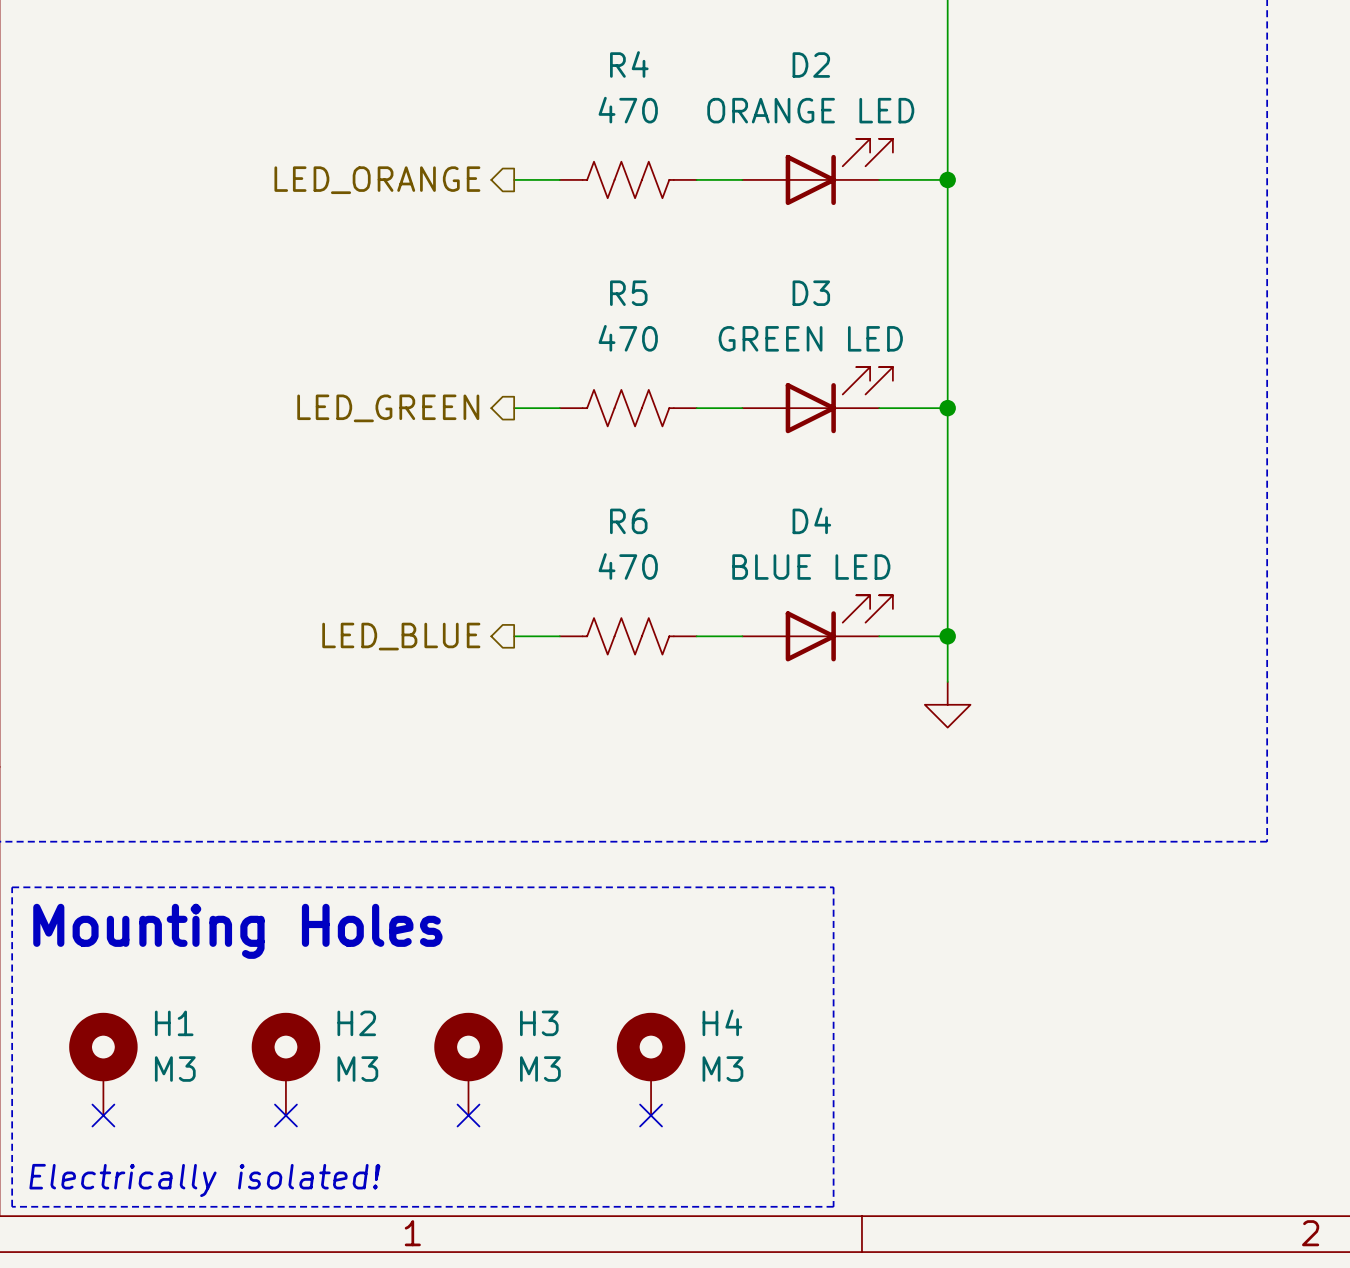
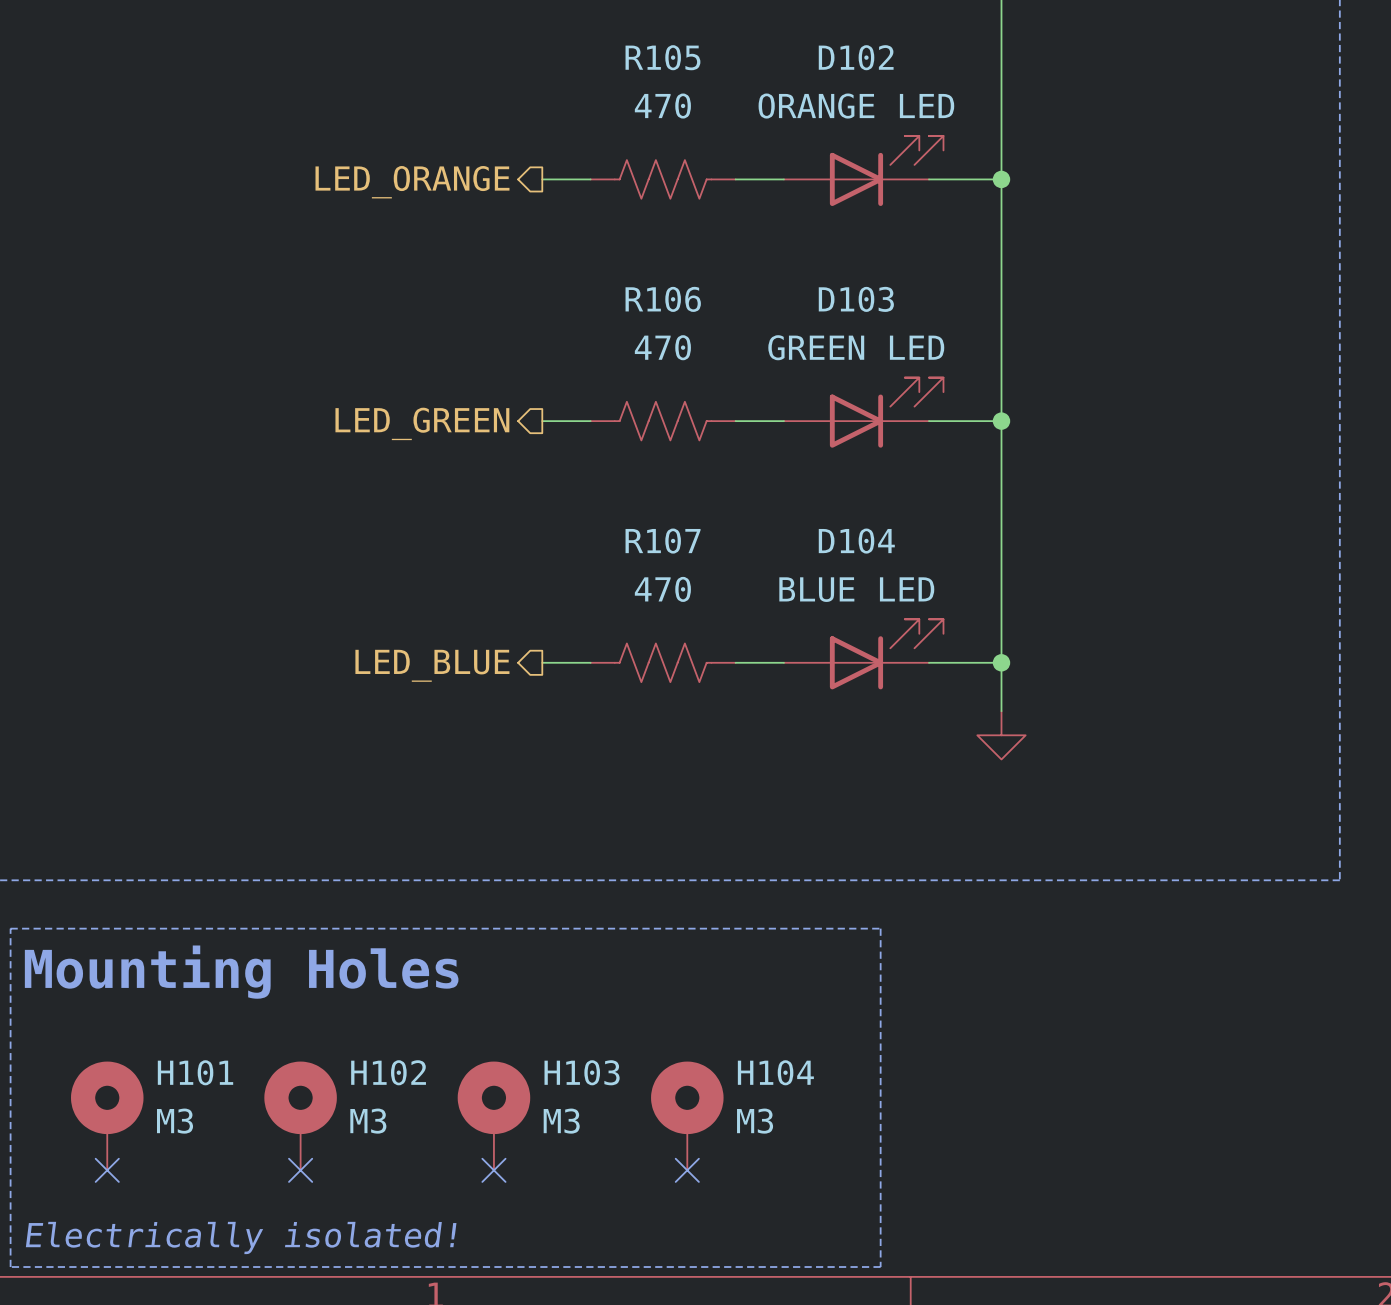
R4 name: R4 (629, 64) -> R105 (662, 57)
D2 name: D2 (811, 65) -> D102 (856, 57)
R5 name: R5 (628, 293) -> R106 (663, 299)
D3 name: D3 (811, 293) -> D103 (856, 299)
D4 name: D4 (811, 520) -> D104 (856, 541)
R6 name: R6 (628, 521) -> R107 (663, 541)
H4 name: H4 (722, 1022) -> H104 (775, 1072)
H1 name: H1 (174, 1023) -> H101 (195, 1072)
H2 name: H2 (356, 1023) -> H102 (388, 1072)
H3 name: H3 (539, 1023) -> H103 (582, 1072)

